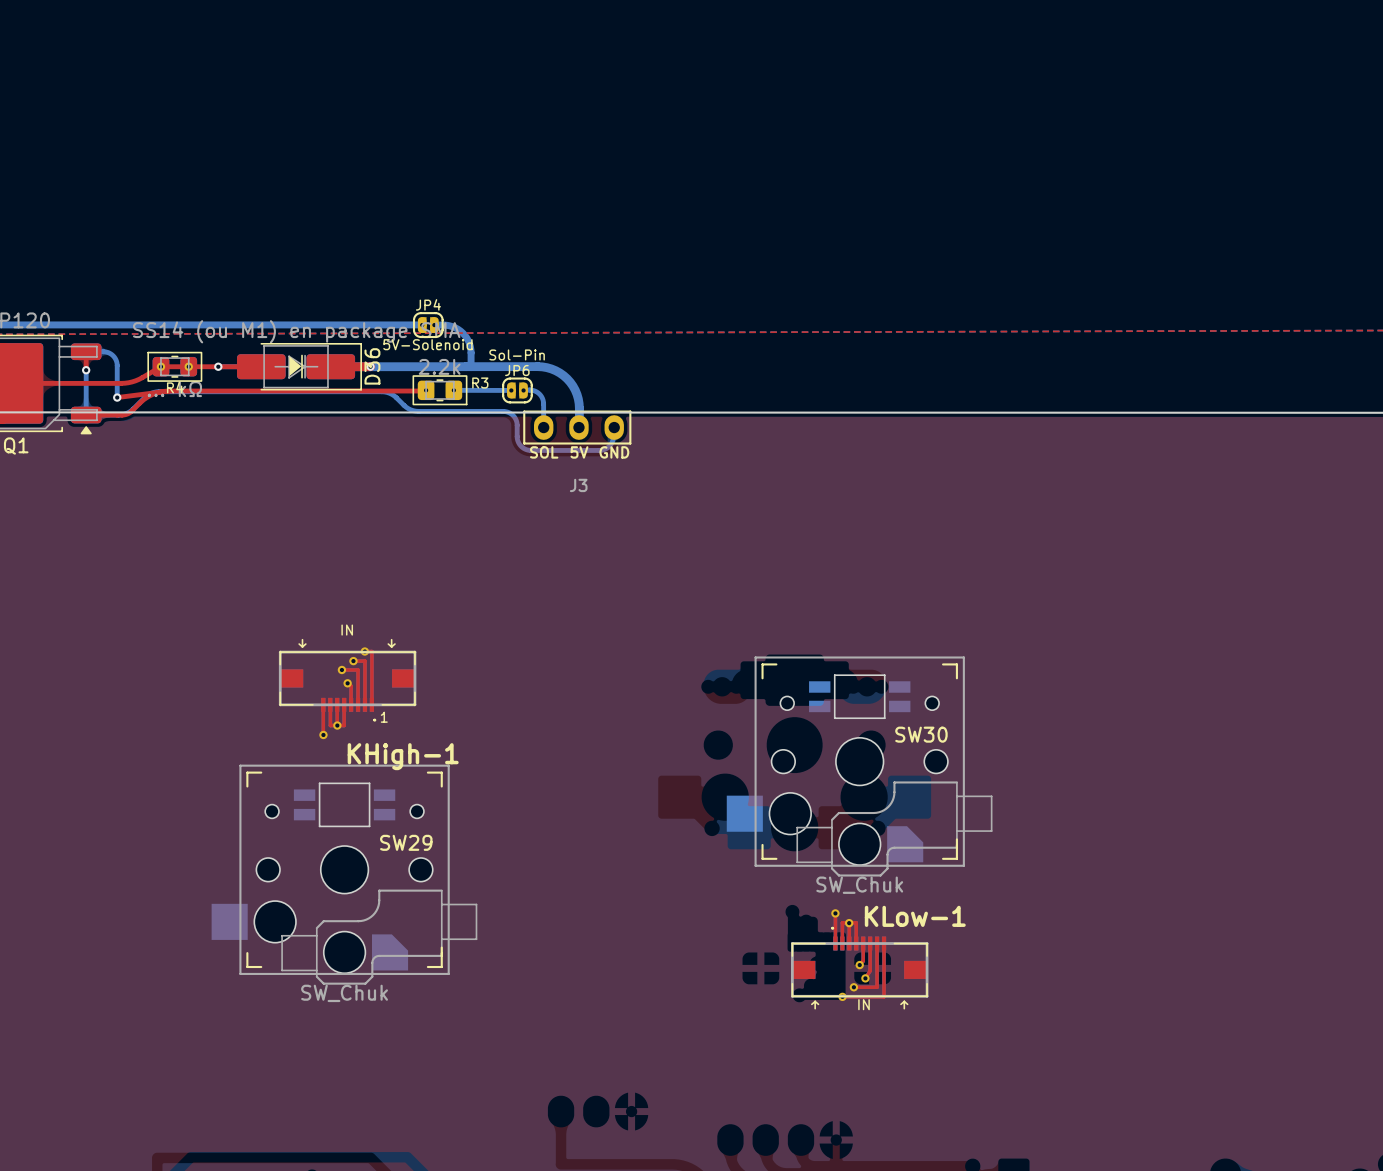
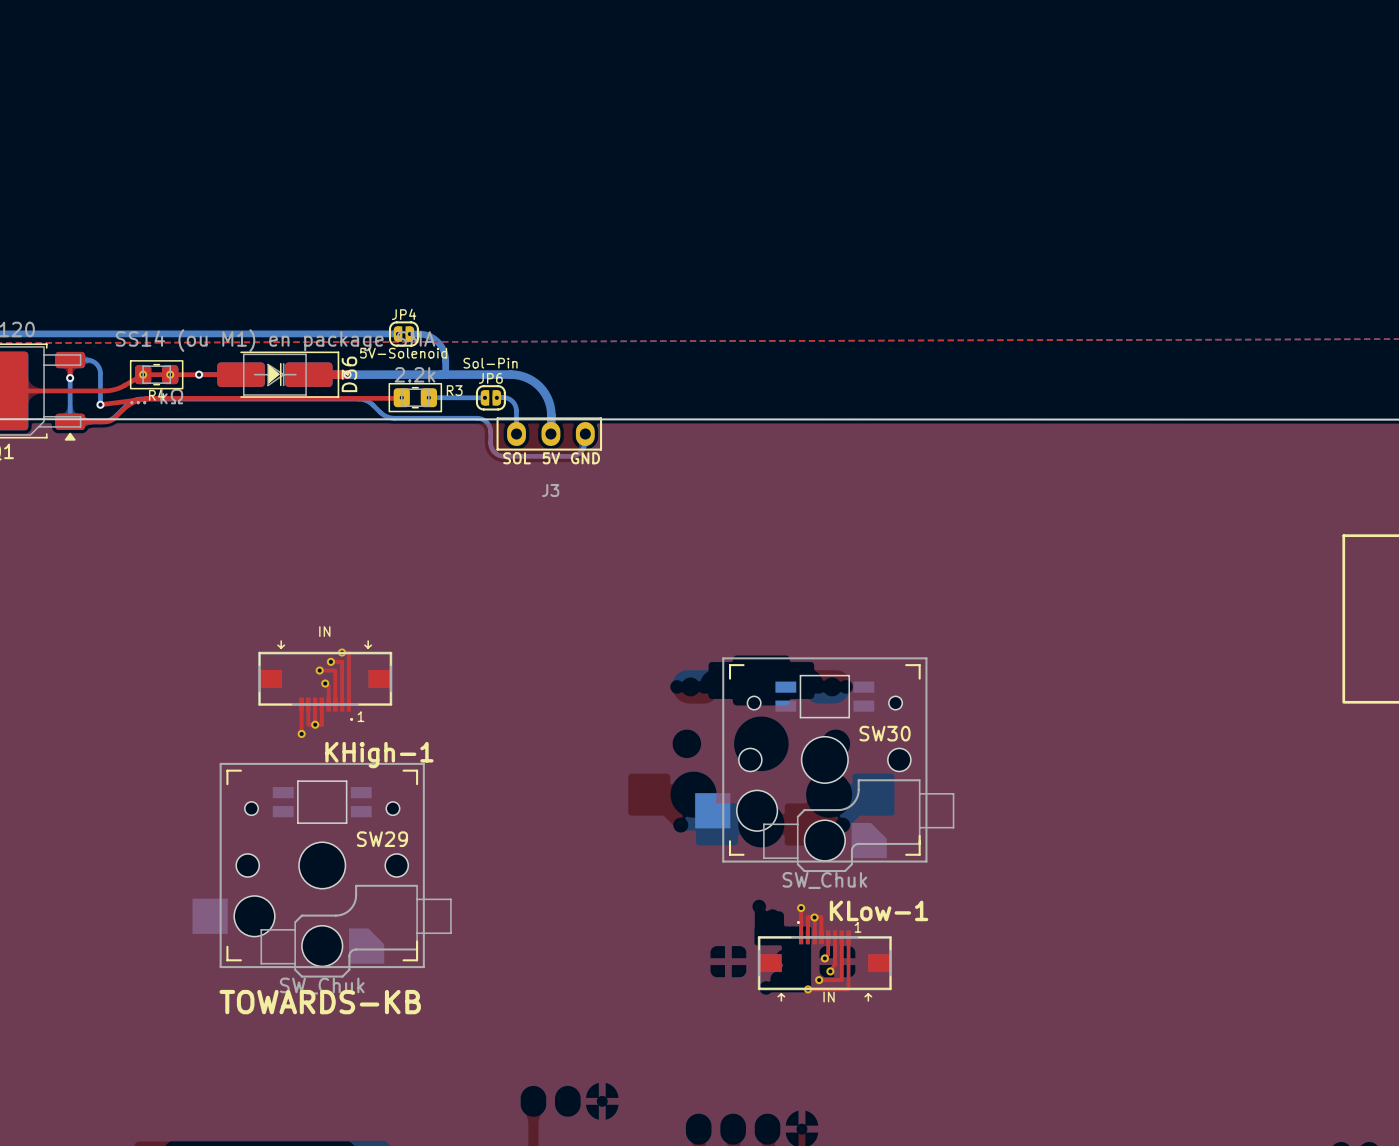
KLow-1 text: none -> 1 (858, 927)
text: none -> TOWARDS-KB (320, 1002)

